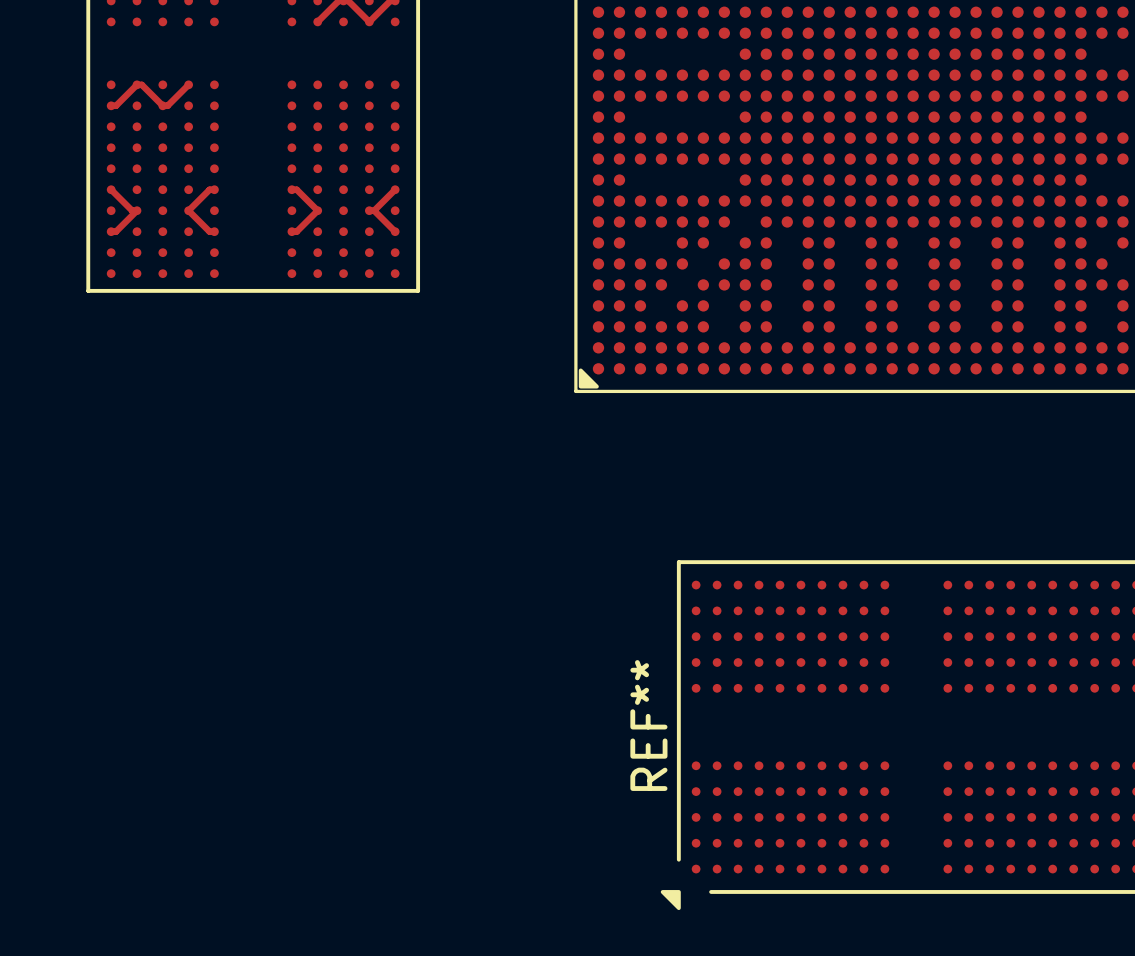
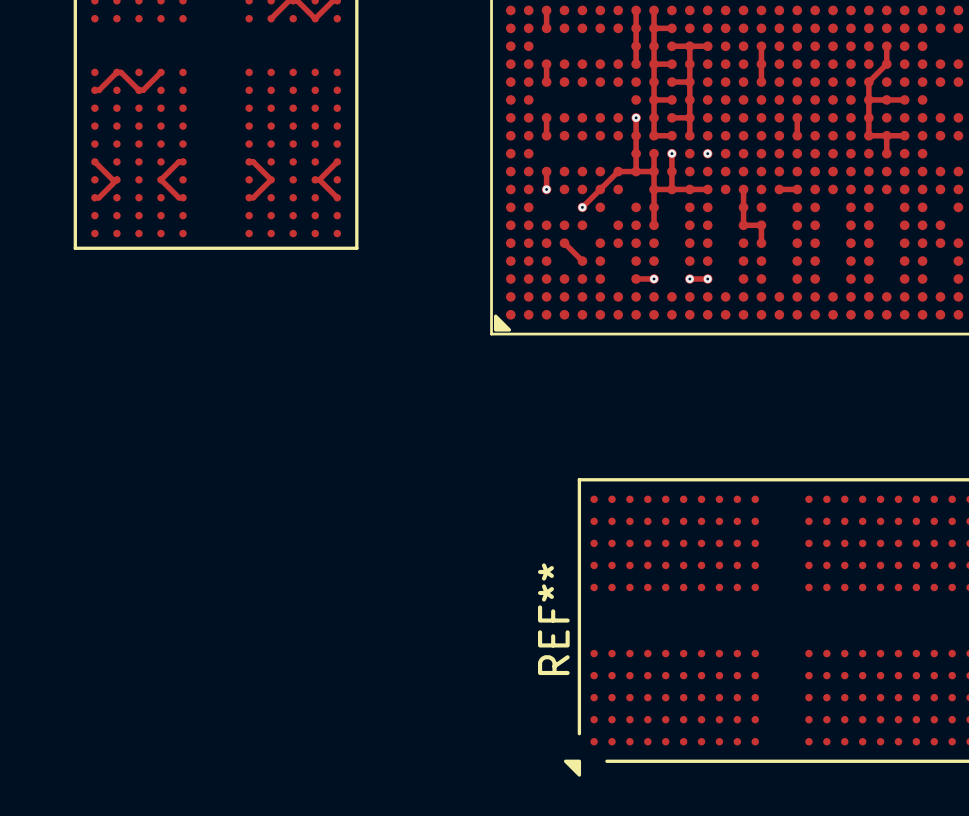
track: none -> (546, 10) (546, 28)
track: none -> (636, 10) (636, 64)
track: none -> (654, 10) (654, 135) (671, 135)
track: none -> (654, 28) (671, 28)
track: none -> (671, 46) (707, 46)
track: none -> (689, 46) (689, 117)
track: none -> (761, 46) (761, 82)
track: none -> (886, 46) (886, 64) (868, 82) (868, 135) (904, 135)
track: none -> (546, 64) (546, 82)
track: none -> (654, 64) (671, 64)
track: none -> (671, 82) (689, 82)
track: none -> (654, 99) (671, 99)
track: none -> (868, 99) (904, 99)
track: none -> (636, 116) (636, 170)
track: none -> (546, 117) (546, 135)
via: none -> (636, 117)
track: none -> (671, 117) (689, 117) (689, 135)
track: none -> (797, 117) (797, 135)
track: none -> (886, 135) (886, 153)
track: none -> (654, 154) (654, 225)
track: none -> (671, 153) (671, 189)
via: none -> (671, 153)
via: none -> (707, 153)
track: none -> (546, 171) (546, 189)
track: none -> (654, 171) (618, 171) (582, 207)
via: none -> (546, 189)
track: none -> (654, 189) (707, 189)
track: none -> (743, 189) (743, 225) (761, 225) (761, 243)
track: none -> (779, 189) (797, 189)
via: none -> (582, 207)
track: none -> (564, 243) (582, 261)
track: none -> (636, 278) (654, 278)
via: none -> (654, 278)
track: none -> (689, 278) (707, 278)
via: none -> (689, 278)
via: none -> (707, 278)

